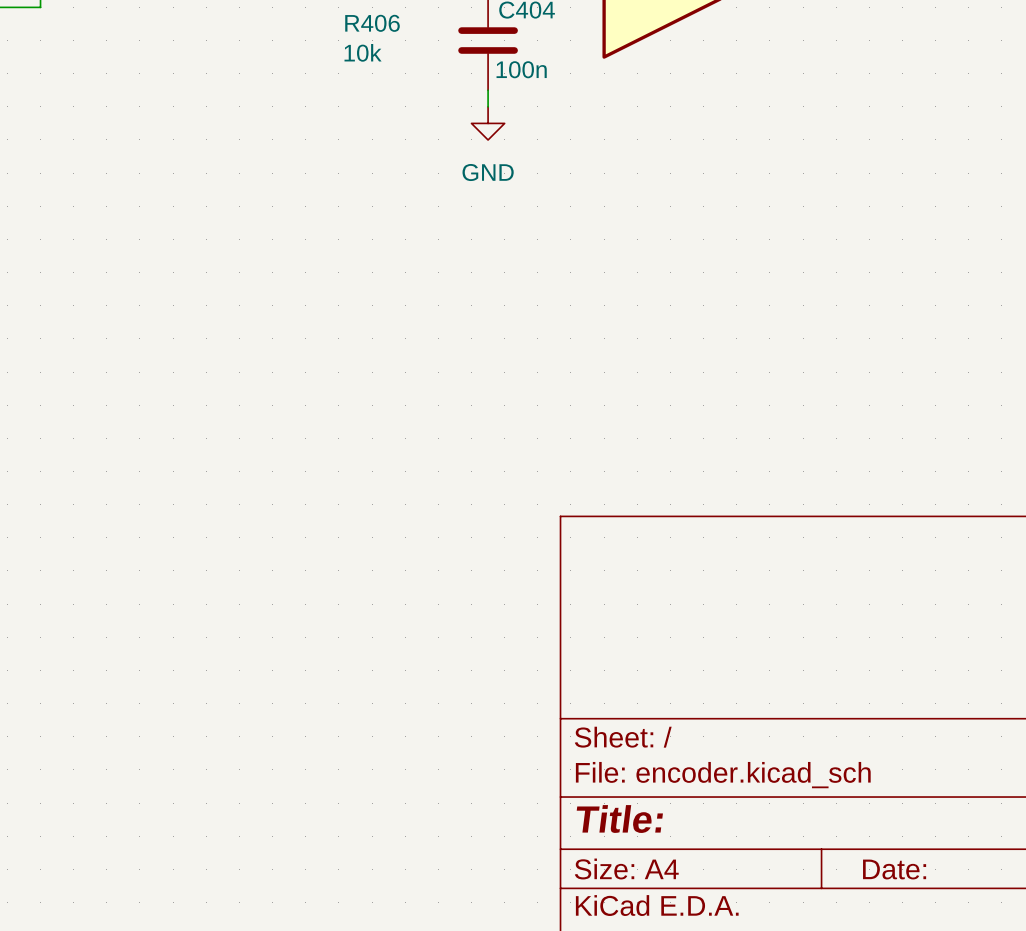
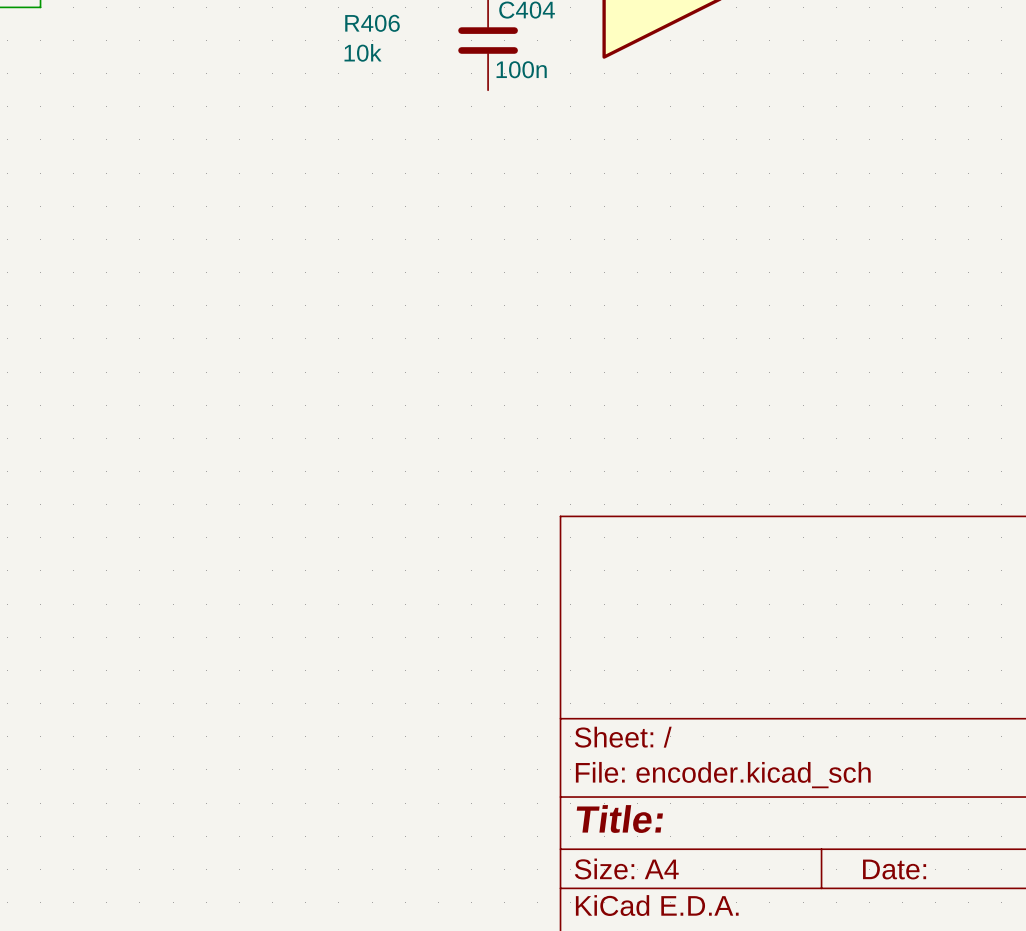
wire: (488, 90) (488, 106) -> none
power symbol: GND (488, 123) -> none

